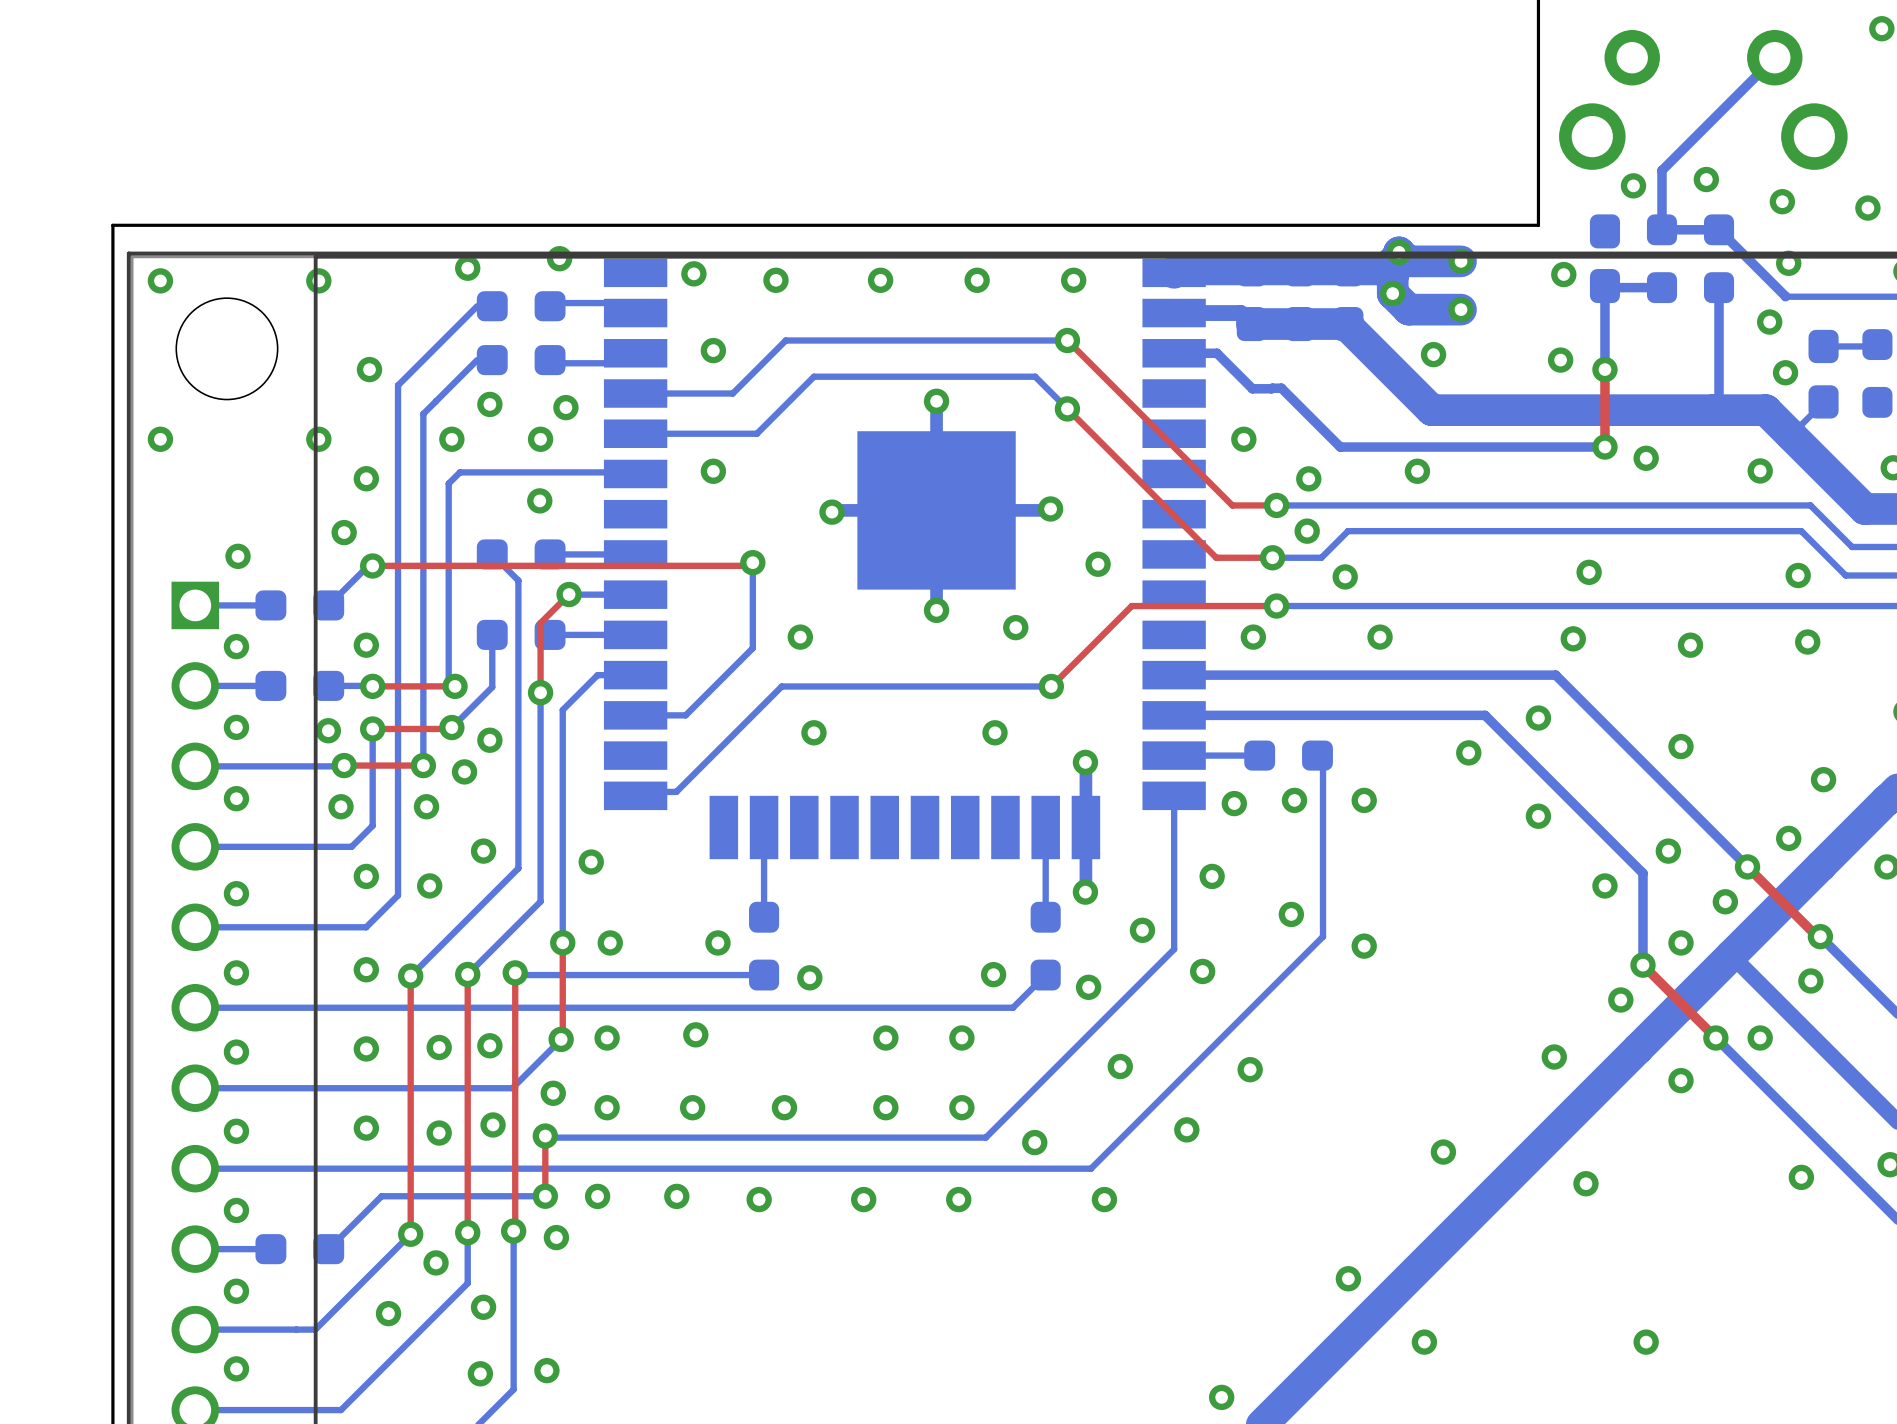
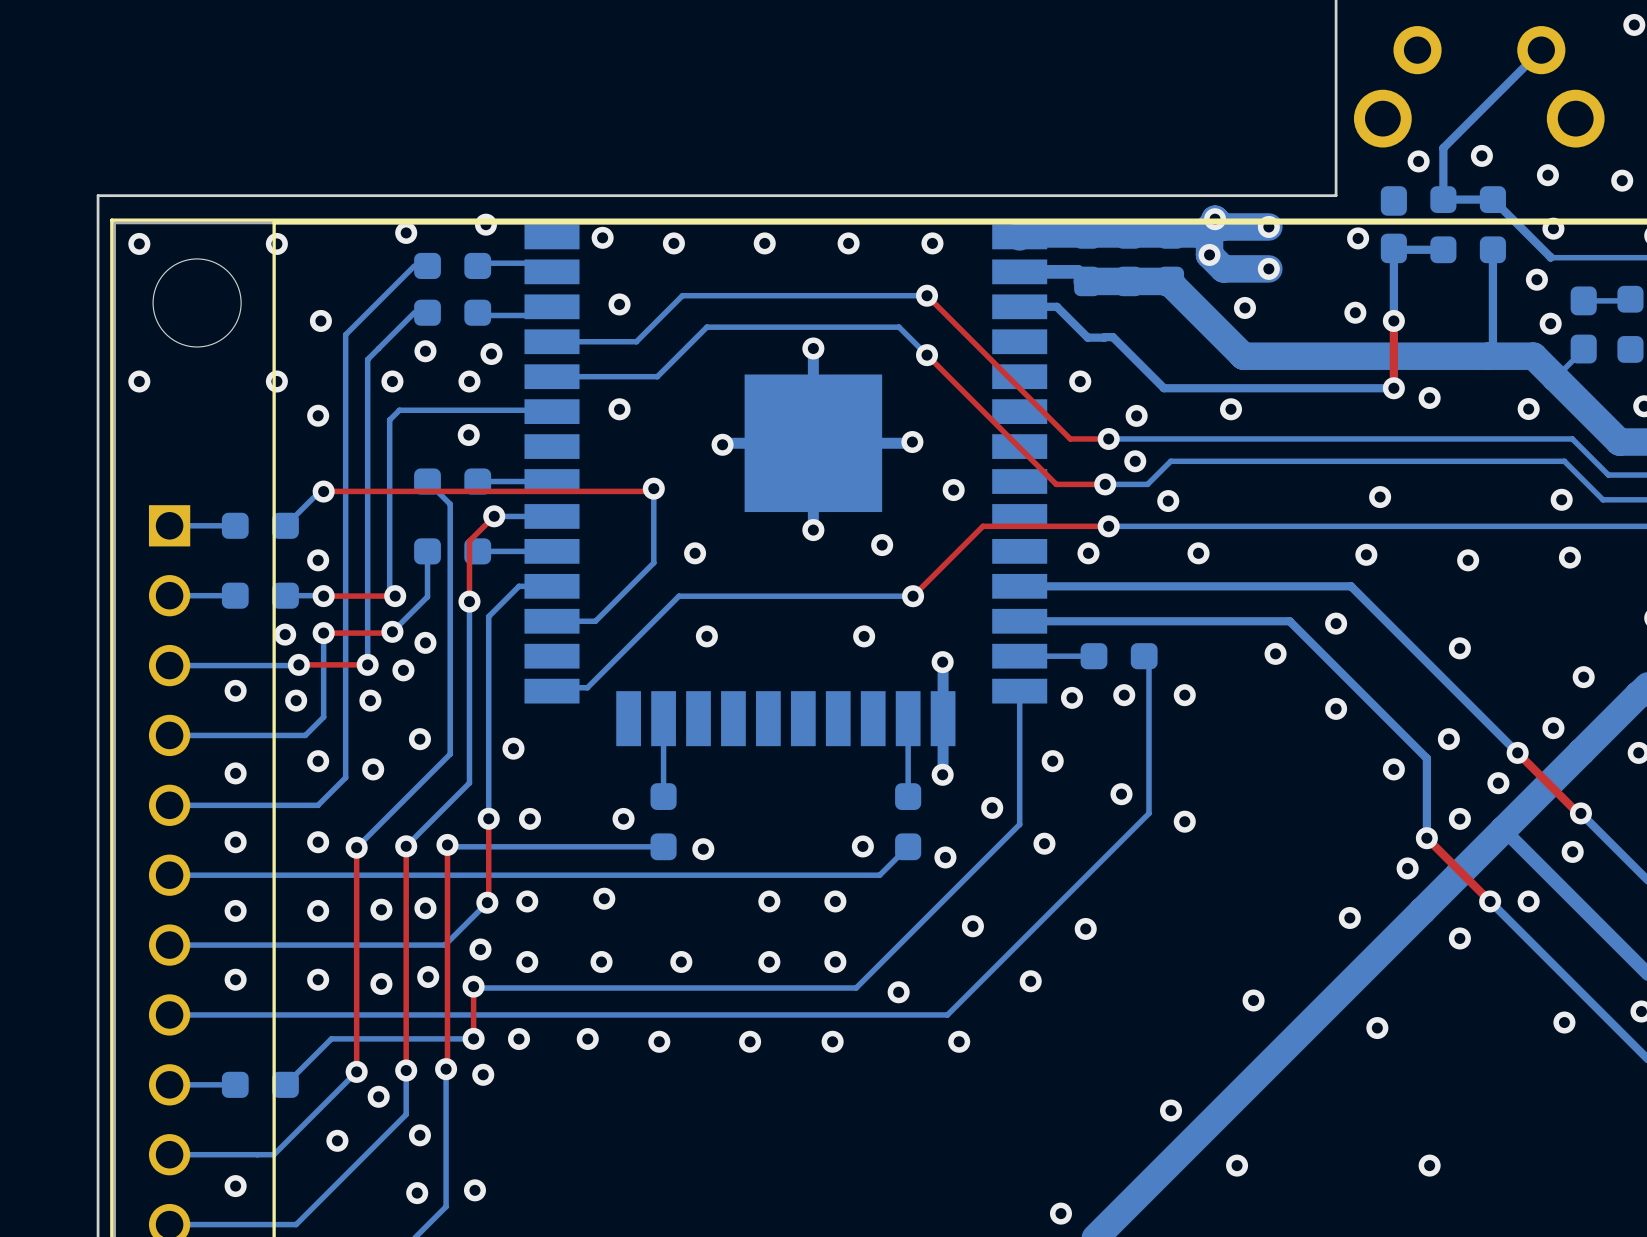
via: (344, 532) -> none
via: (238, 556) -> none
via: (236, 646) -> none
via: (236, 727) -> none
via position: (236, 798) -> (235, 690)
via position: (236, 893) -> (235, 773)
via position: (236, 972) -> (235, 842)
via position: (236, 1052) -> (235, 910)
via position: (236, 1131) -> (235, 979)
via: (236, 1210) -> none
via: (236, 1291) -> none
via position: (236, 1368) -> (235, 1186)

